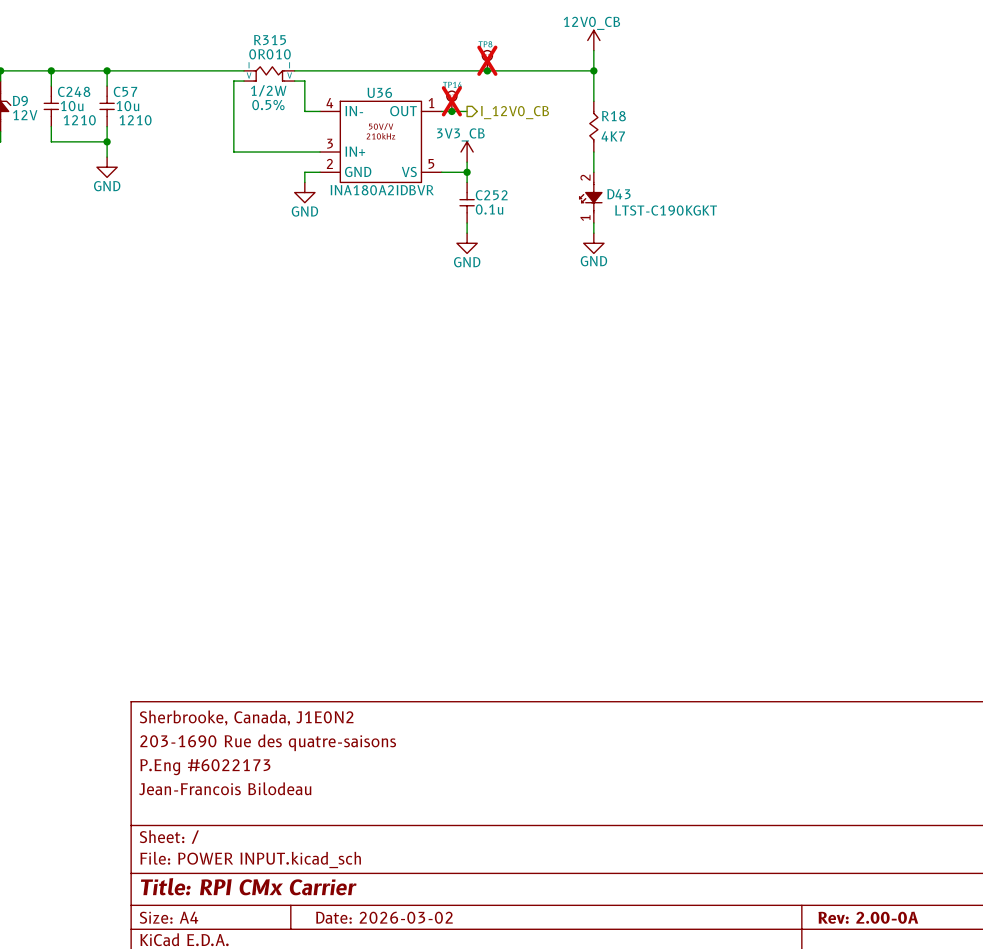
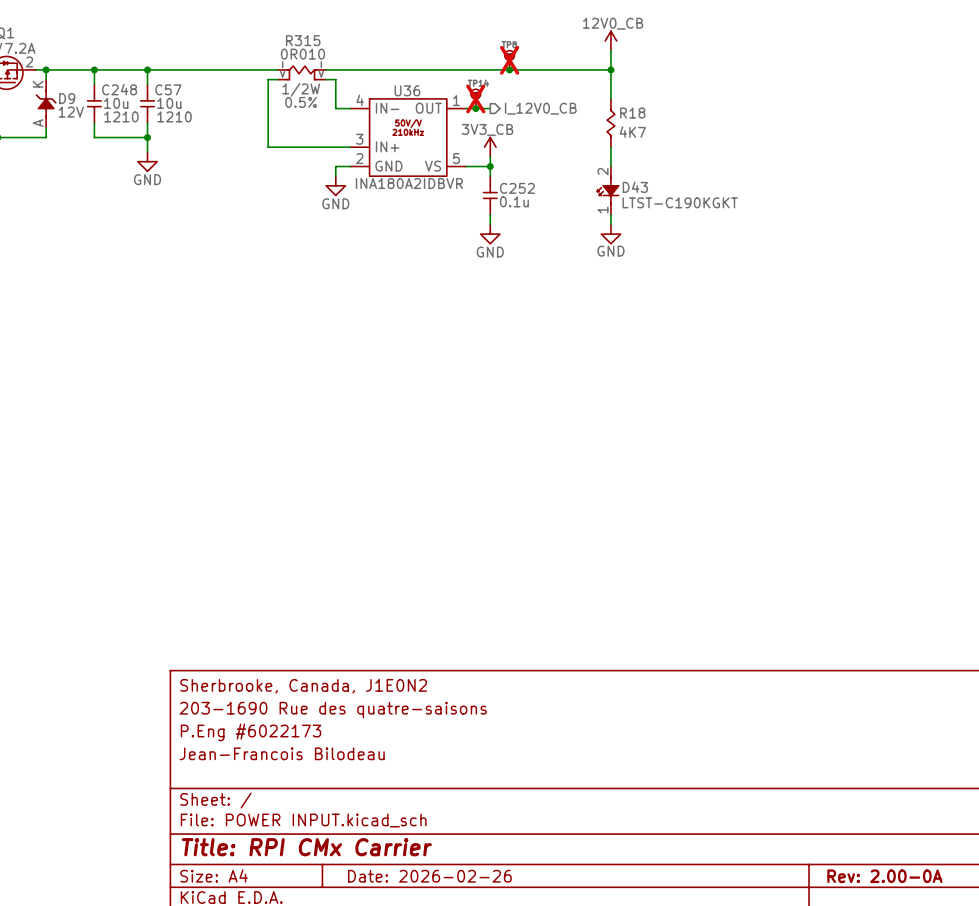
title block: Date: 2026-03-02 (384, 917) -> Date: 2026-02-26 (429, 876)

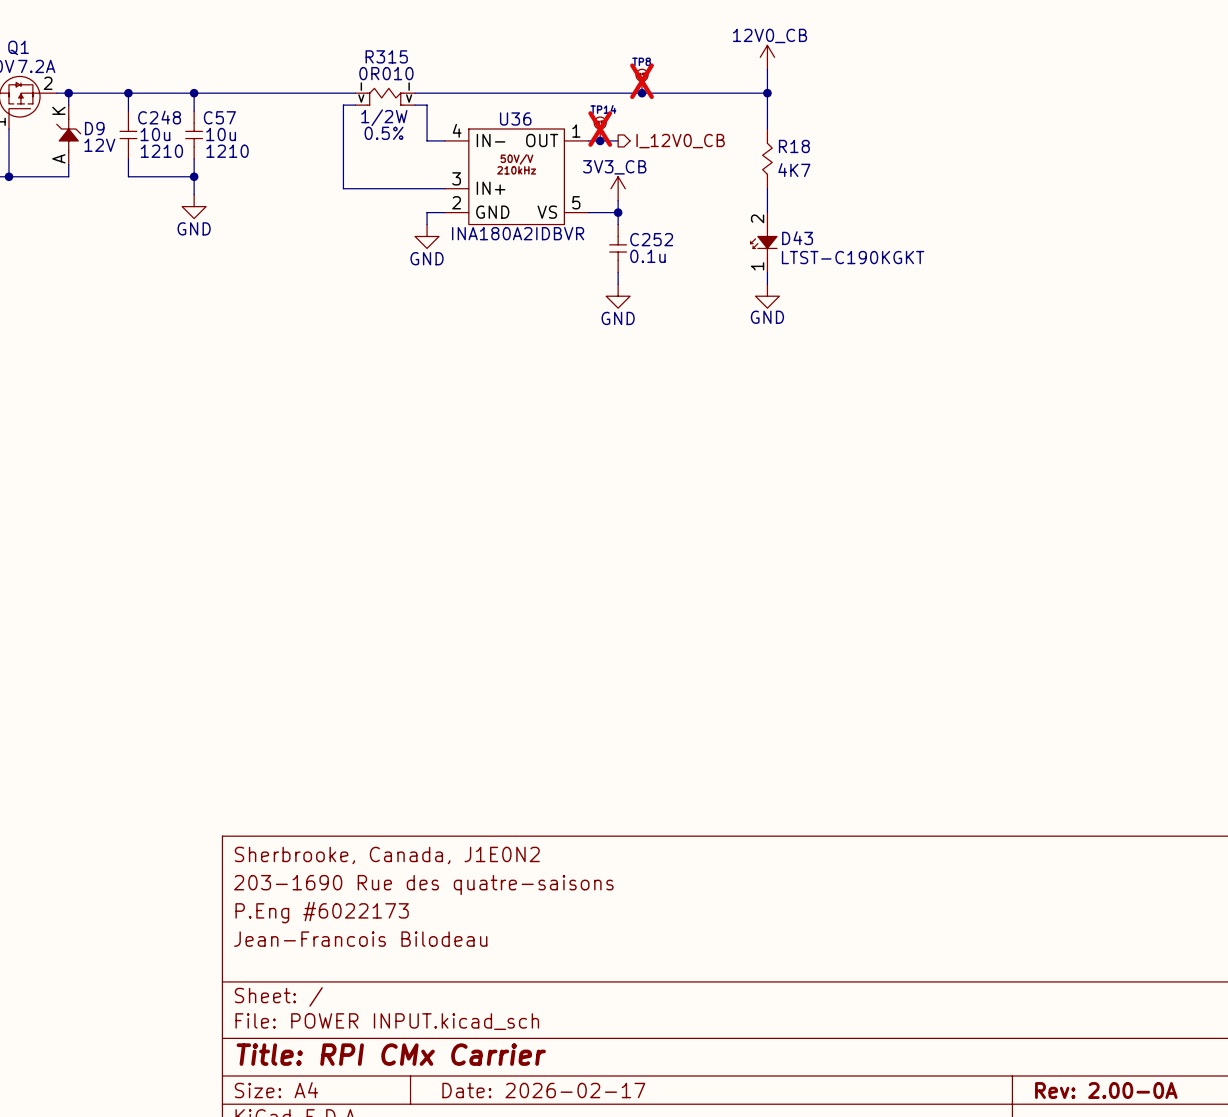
title block: Date: 2026-02-26 (429, 876) -> Date: 2026-02-17 (543, 1090)

